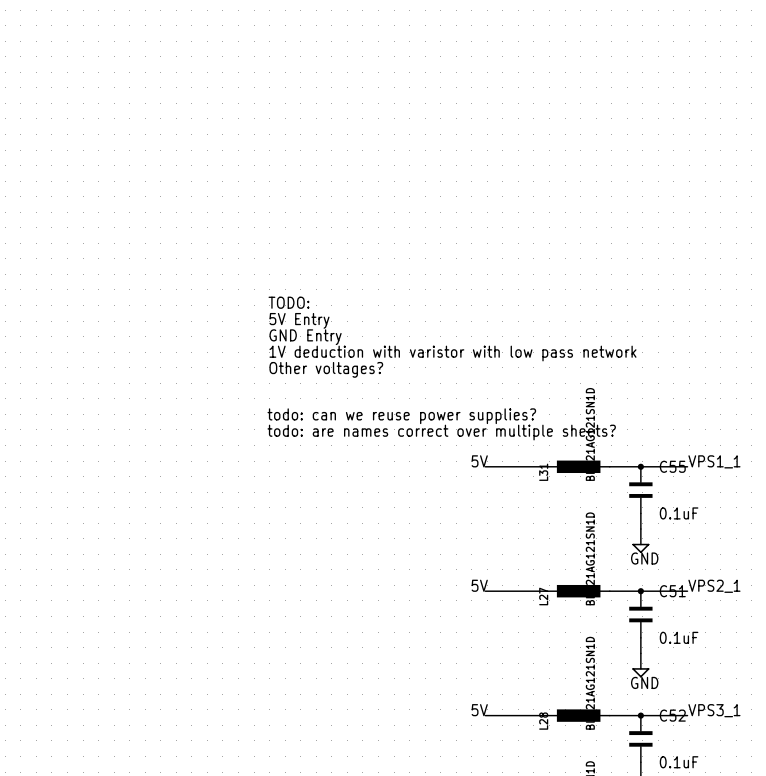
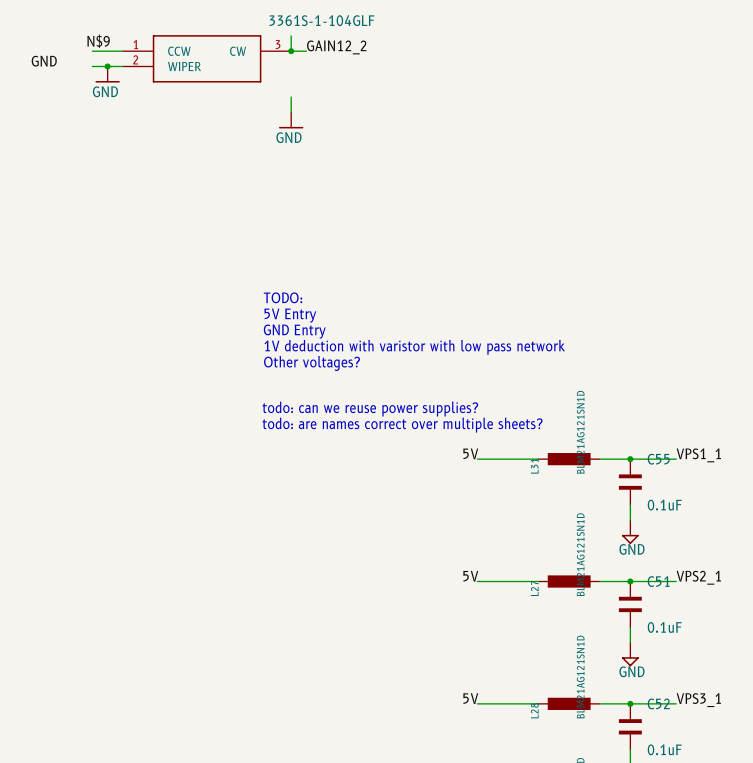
wire: none -> (291, 35) (291, 51) (306, 51)
label: none -> N$9 (98, 41)
label: none -> GAIN12_2 (336, 47)
wire: none -> (92, 51) (122, 51)
junction: none -> (291, 51)
part: none -> 3361S-1-104GLF (207, 58)
label: none -> GND (44, 61)
wire: none -> (92, 66) (122, 66)
junction: none -> (107, 66)
power symbol: none -> GND (107, 74)
wire: none -> (291, 97) (291, 112)
power symbol: none -> GND (291, 120)

